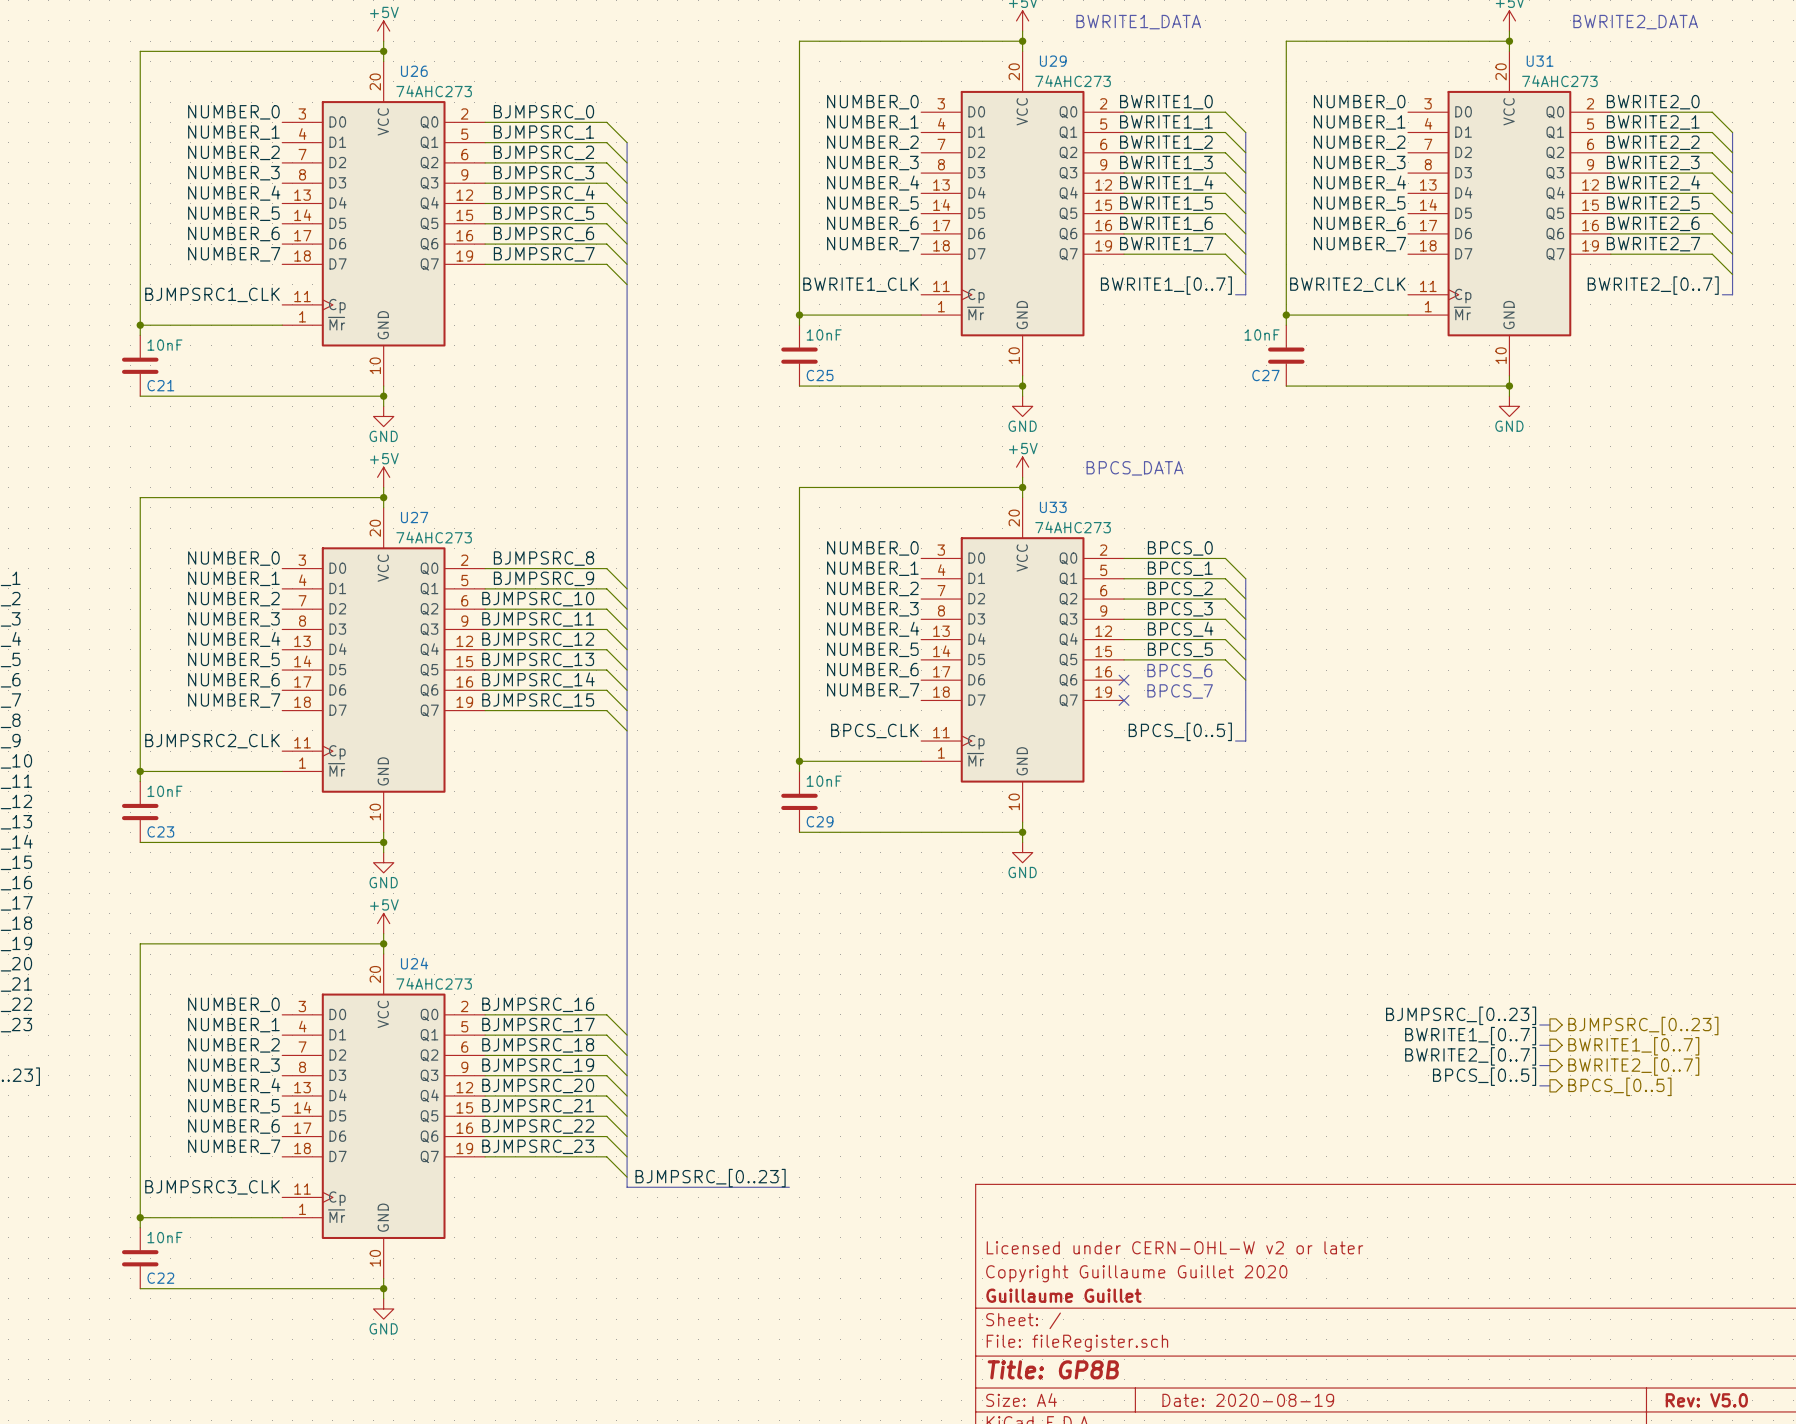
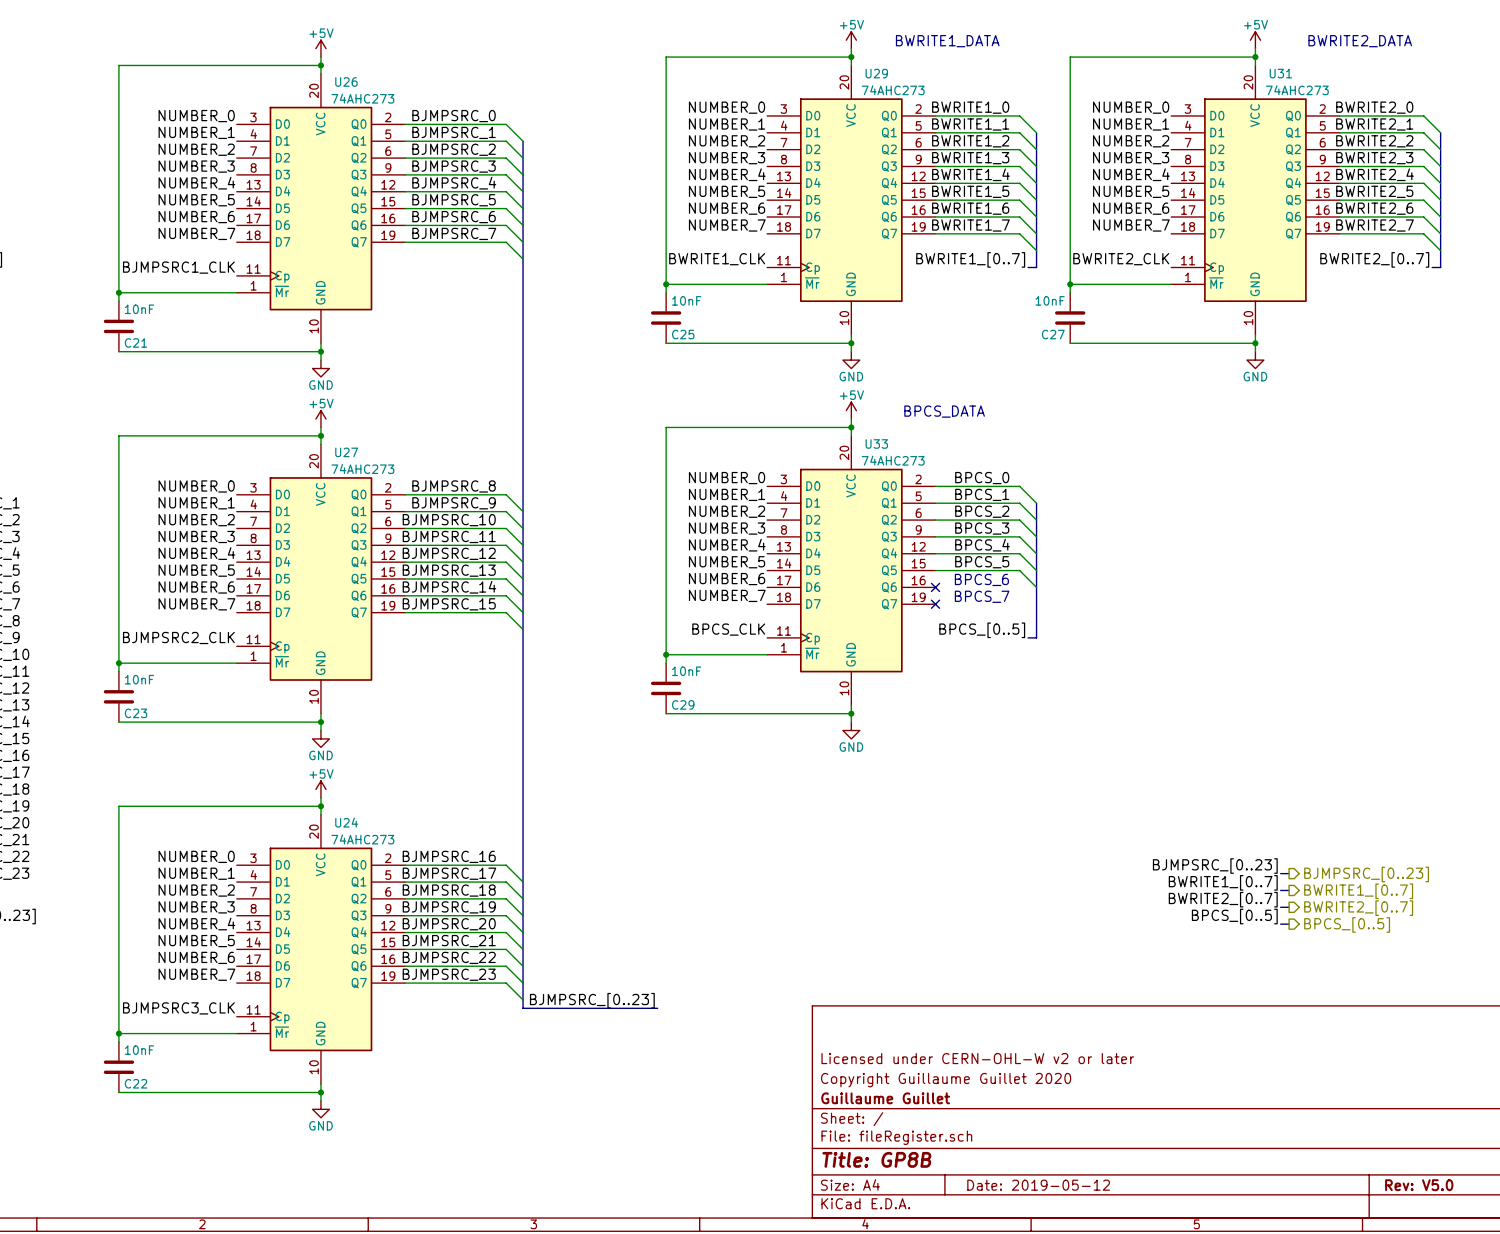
title block: Date: 2020-08-19 (1248, 1400) -> Date: 2019-05-12 (1038, 1185)

